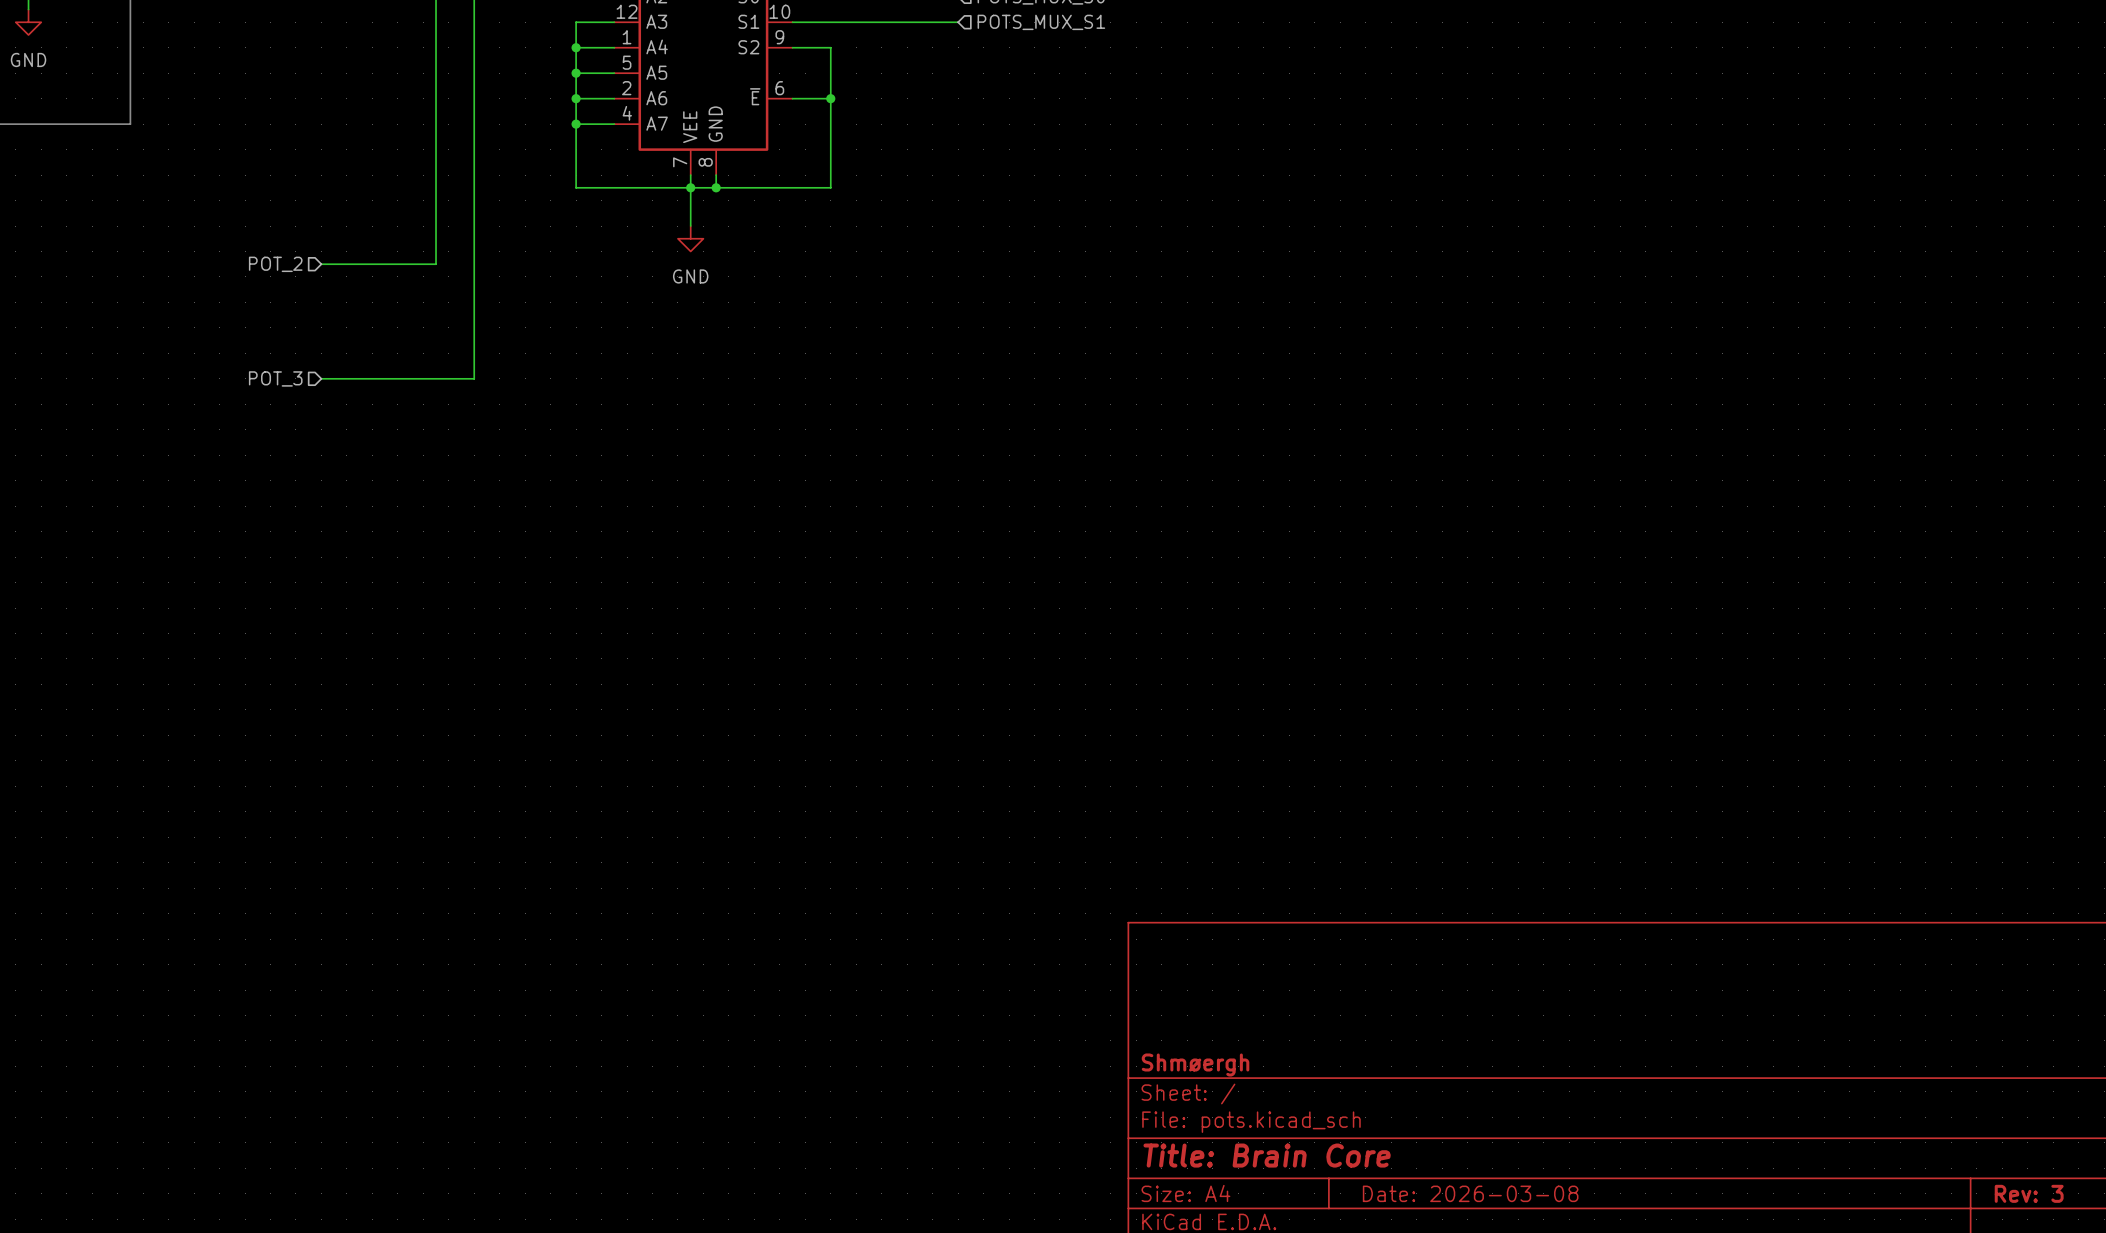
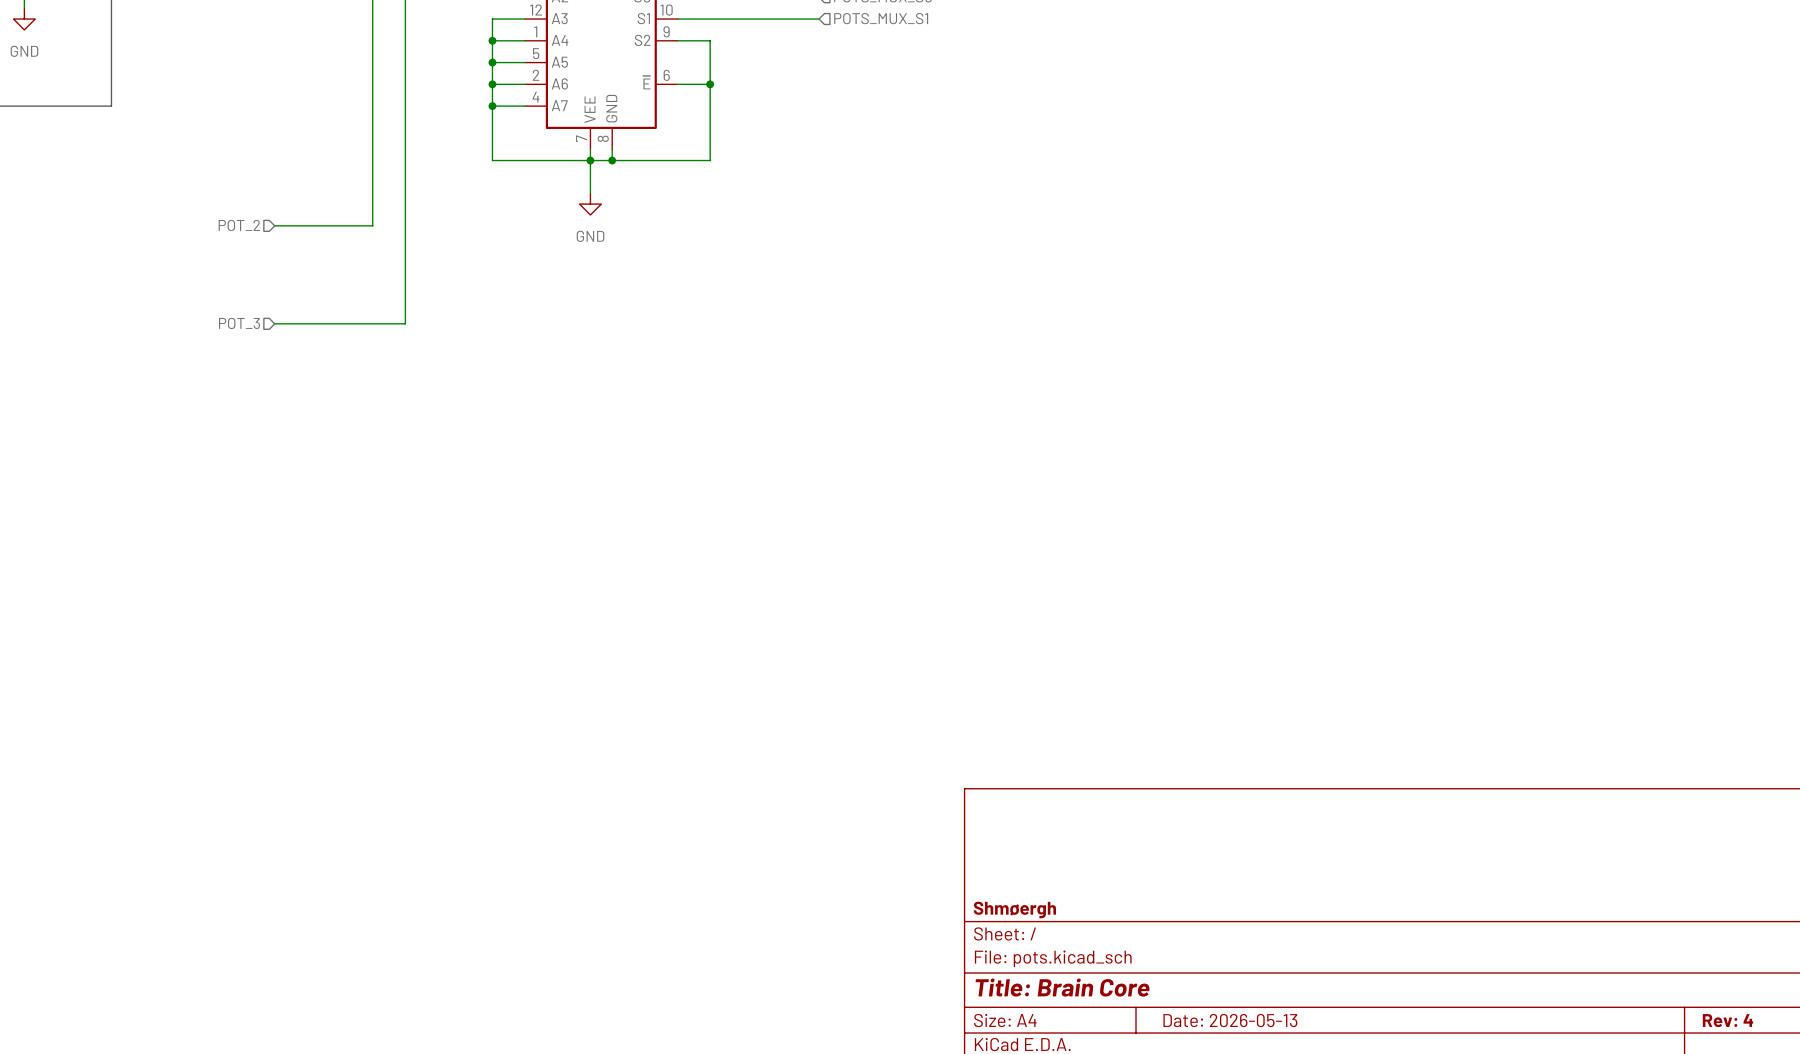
title block: Date: 2026-03-08 (1470, 1193) -> Date: 2026-05-13 (1230, 1020)
title block: Rev: 3 (2029, 1193) -> Rev: 4 (1727, 1020)

